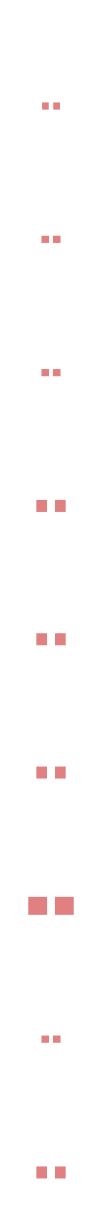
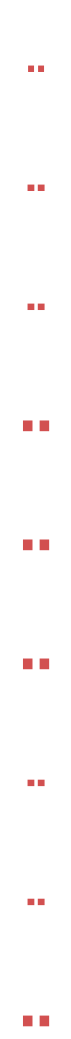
part footprint: [28, 896, 74, 915] -> [27, 779, 45, 787]

